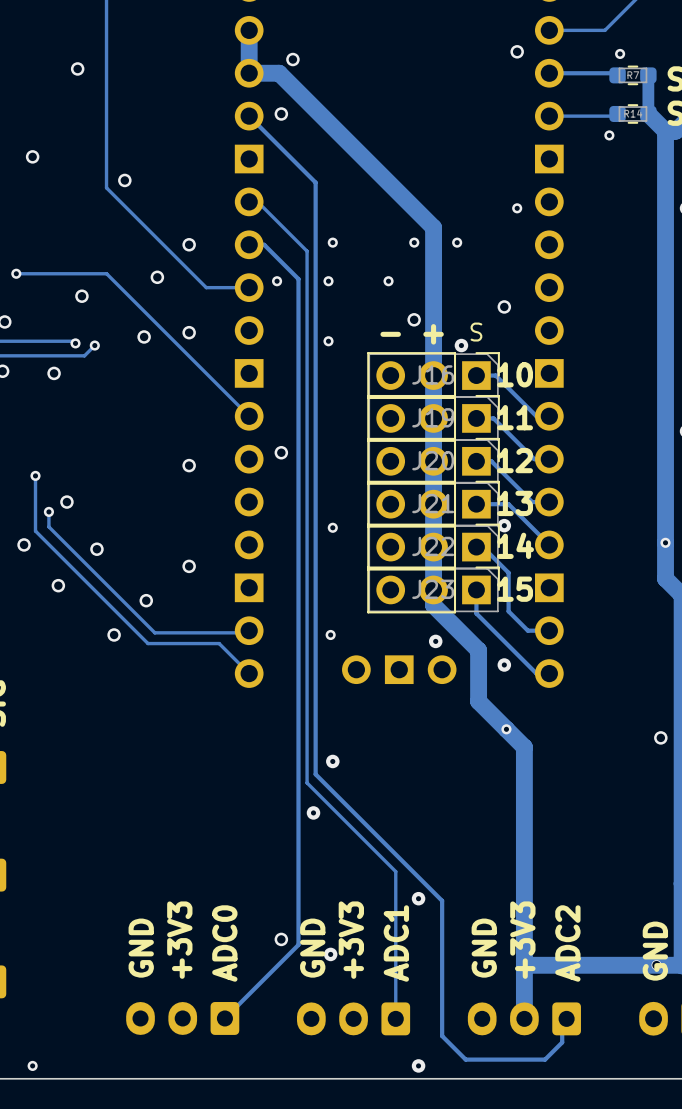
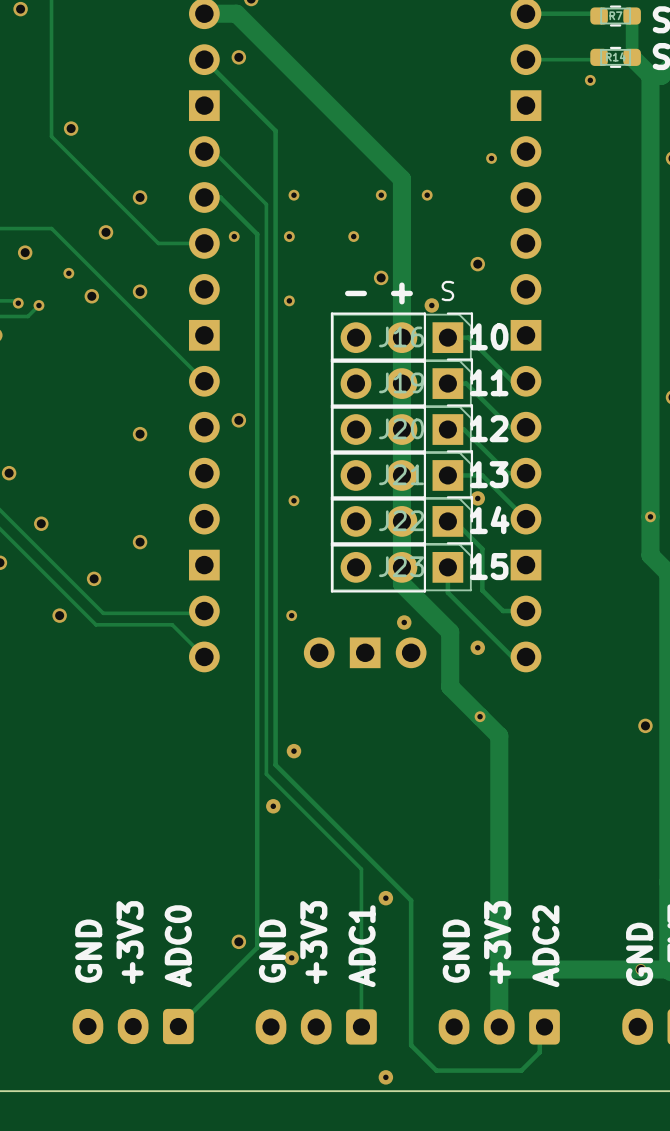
via: none -> (68, 273)

